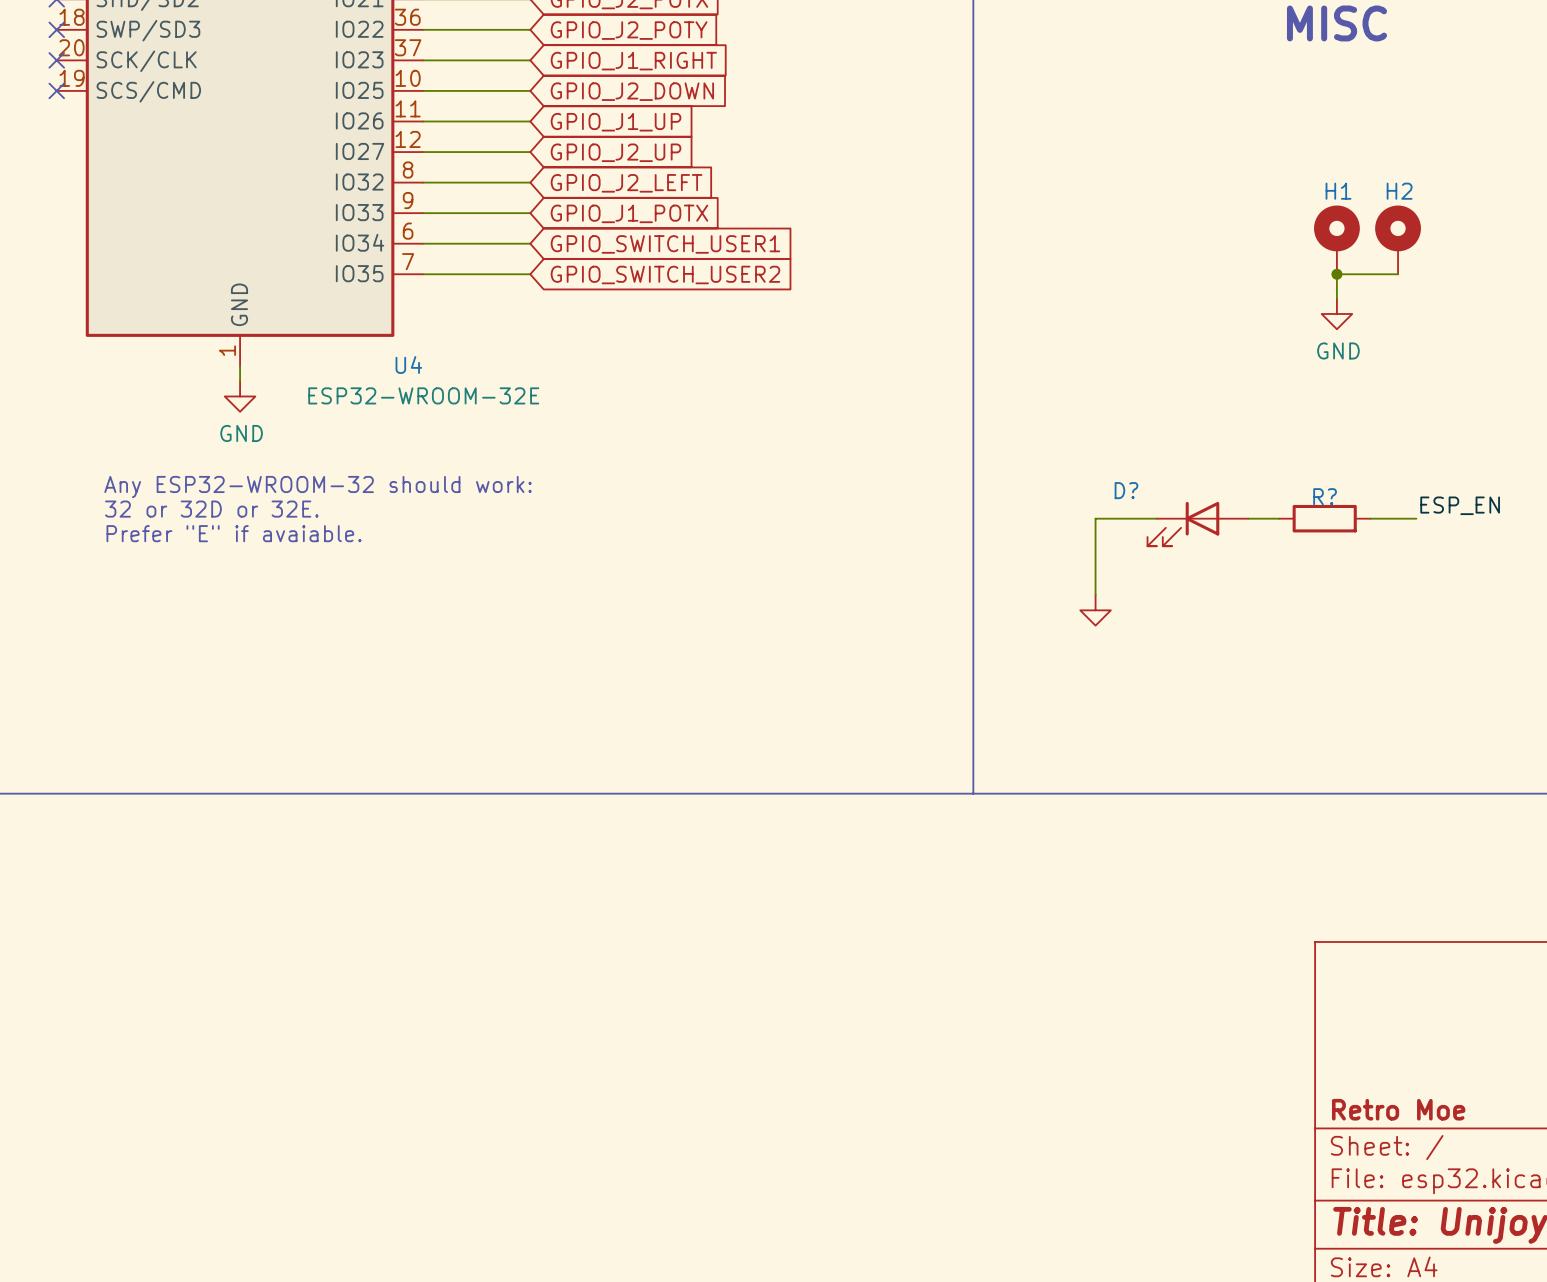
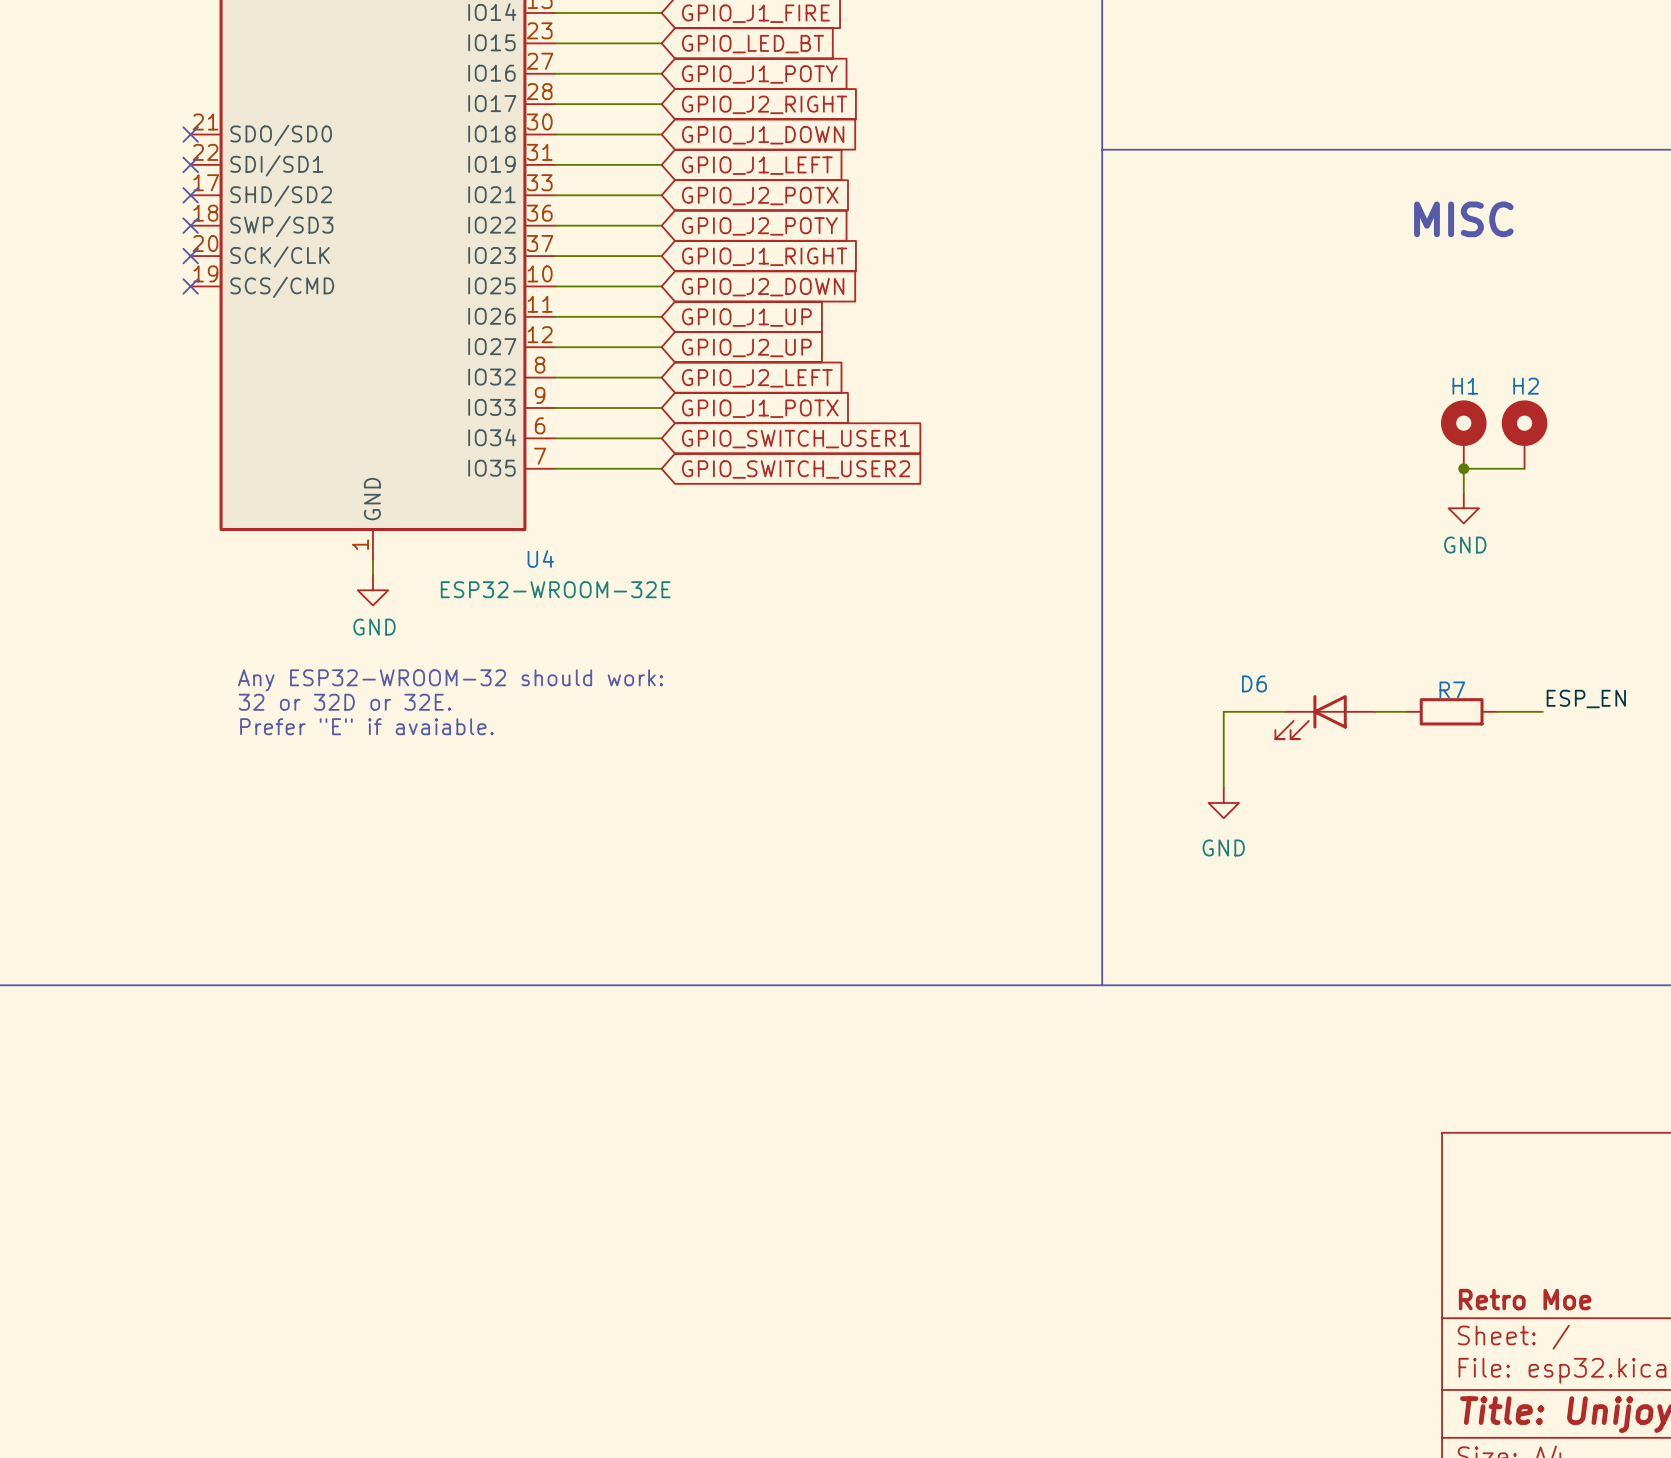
D? name: D? (1126, 490) -> D6 (1254, 683)
R? name: R? (1325, 496) -> R7 (1452, 689)
power symbol text: none -> GND (1223, 847)

